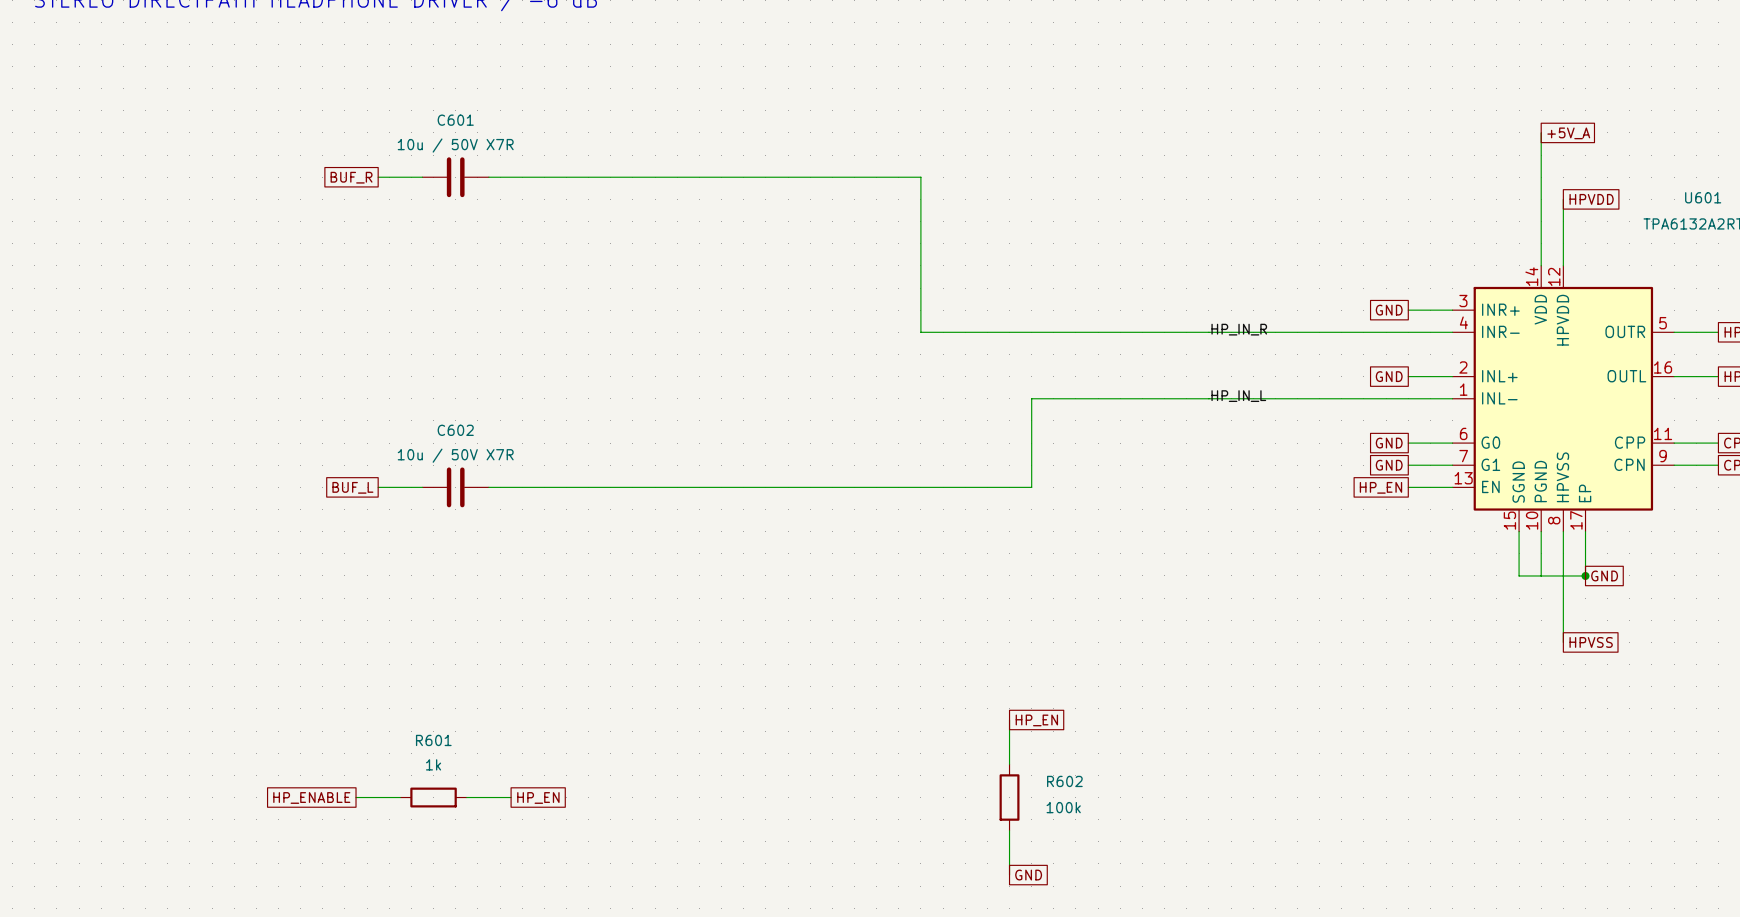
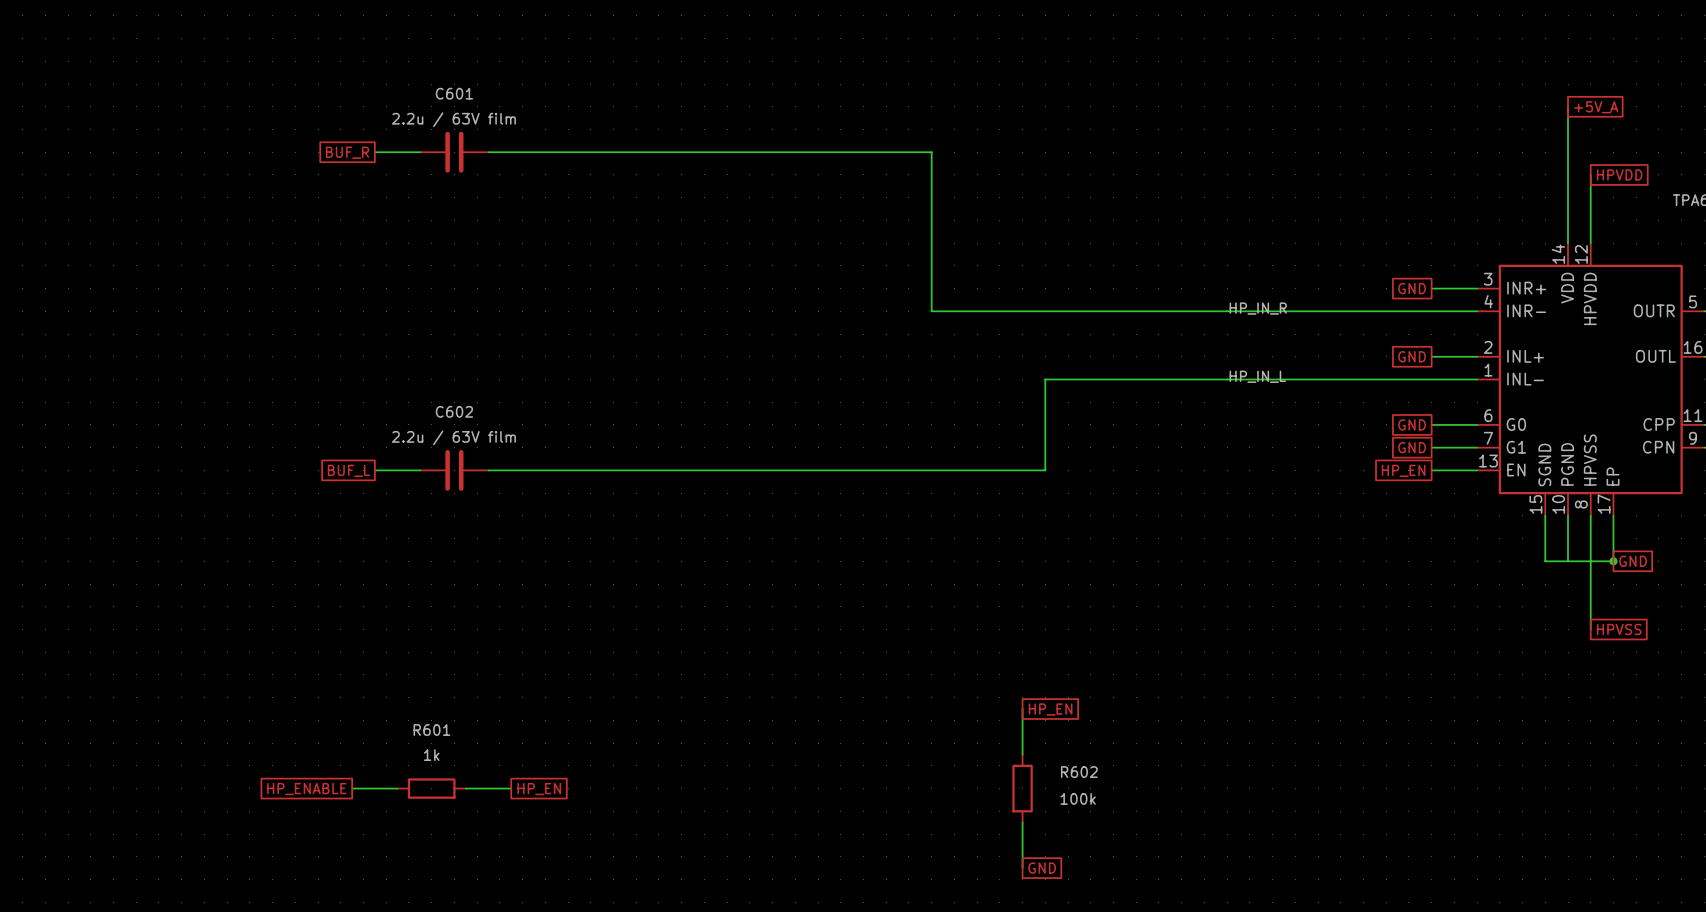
C601 value: 10u / 50V X7R (455, 145) -> 2.2u / 63V film (453, 119)
C602 value: 10u / 50V X7R (455, 455) -> 2.2u / 63V film (453, 437)

